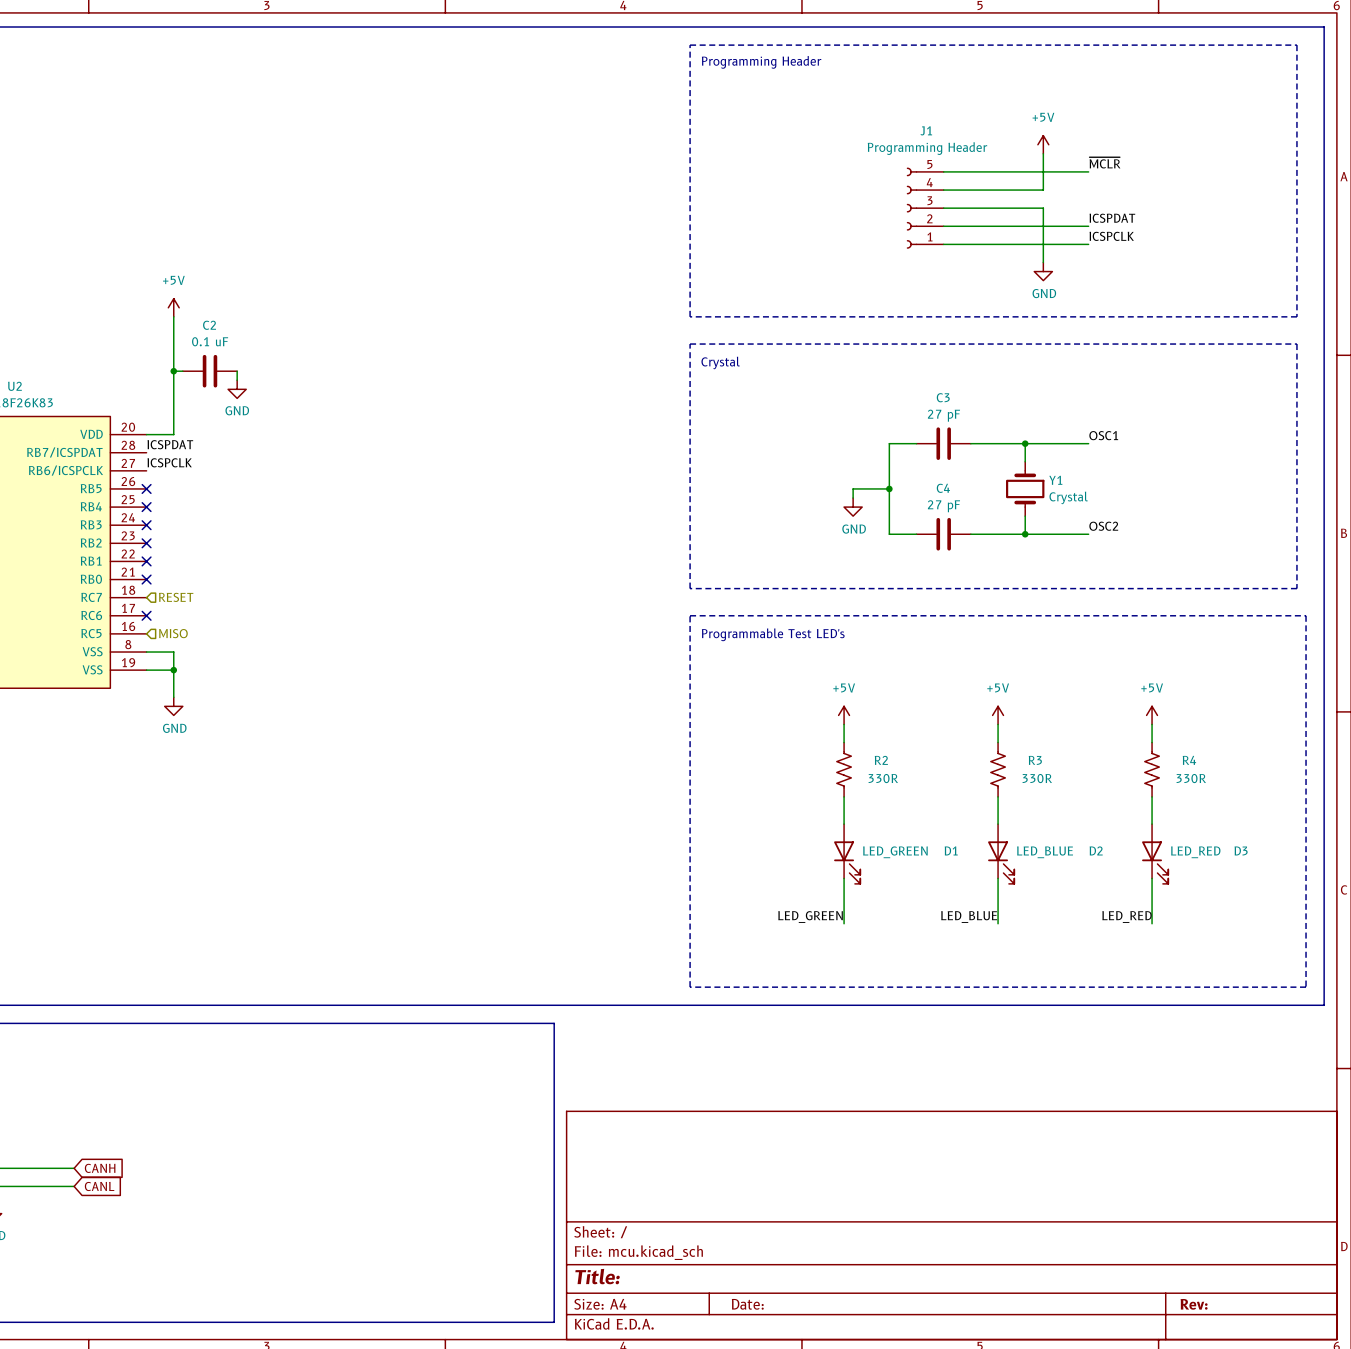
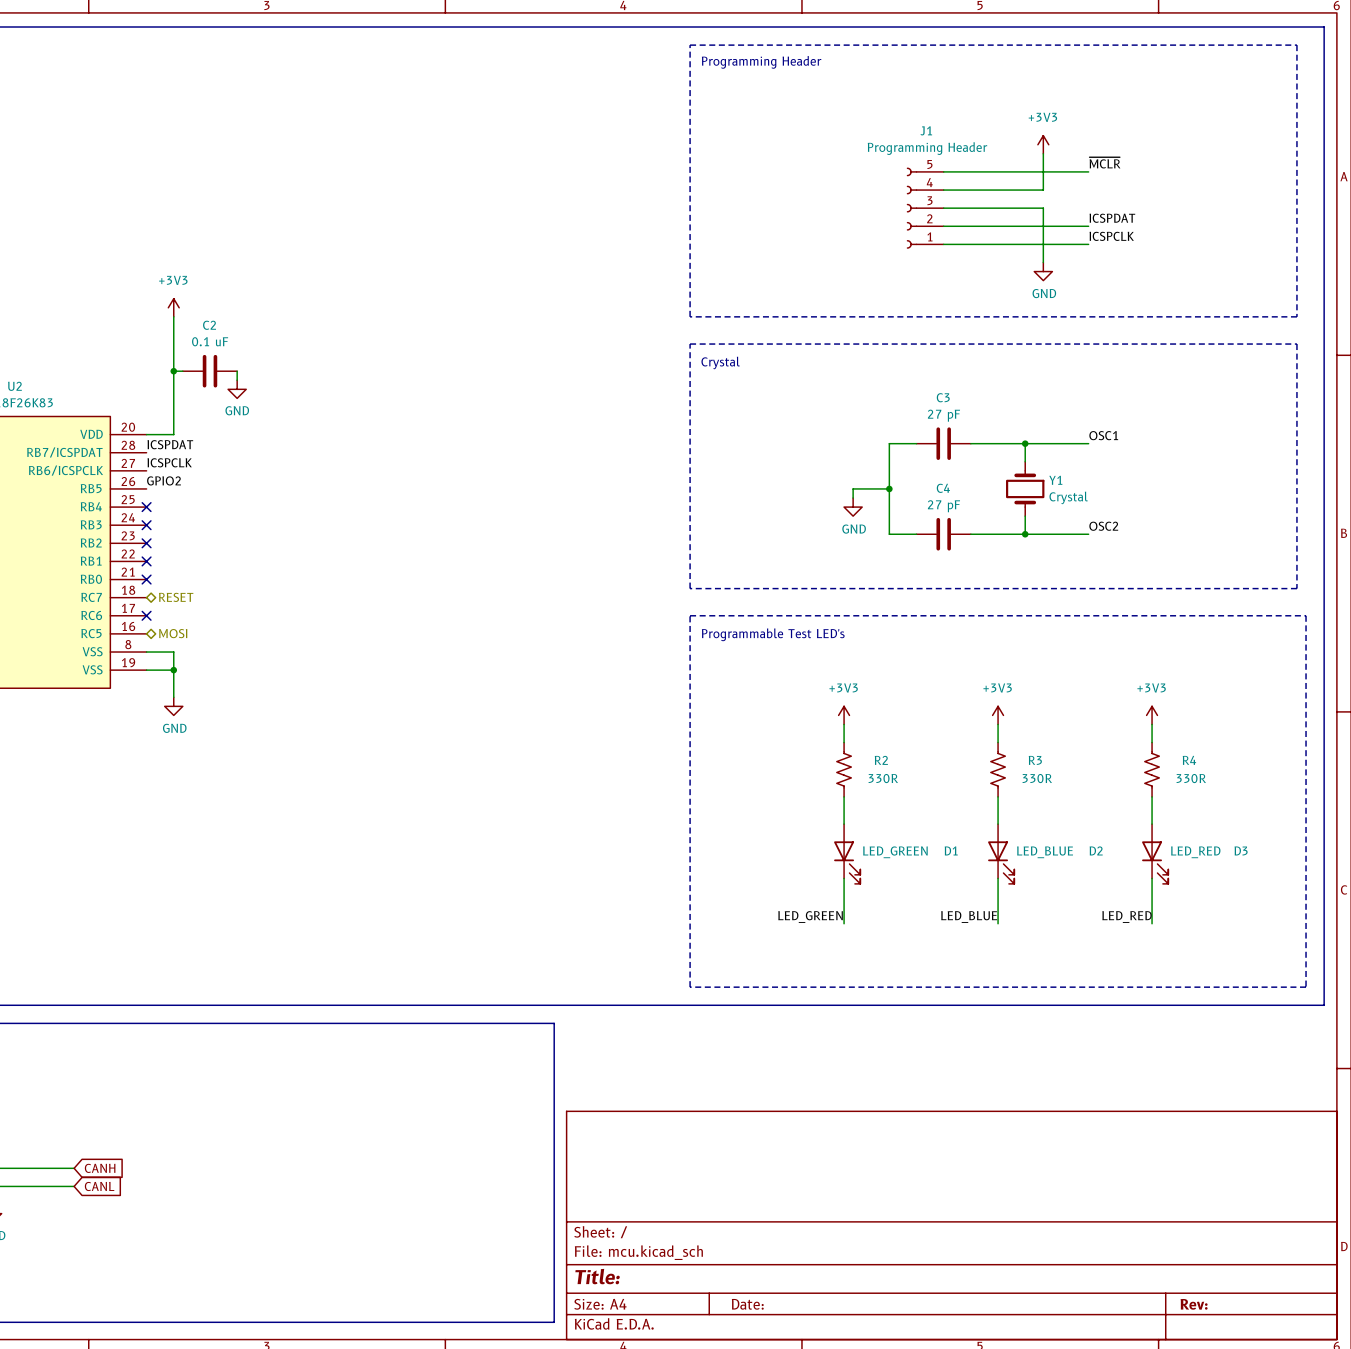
power symbol: +5V (1043, 144) -> +3V3 (1043, 144)
power symbol: +5V (173, 307) -> +3V3 (173, 307)
label: none -> GPIO2 (163, 480)
no-connect mark: (146, 488) -> none
hierarchical label shape: input (176, 597) -> bidirectional (176, 597)
hierarchical label shape: input (173, 633) -> bidirectional (173, 633)
hierarchical label: MISO (173, 633) -> MOSI (173, 633)
power symbol: +5V (844, 715) -> +3V3 (844, 715)
power symbol: +5V (998, 715) -> +3V3 (998, 715)
power symbol: +5V (1152, 715) -> +3V3 (1152, 715)

